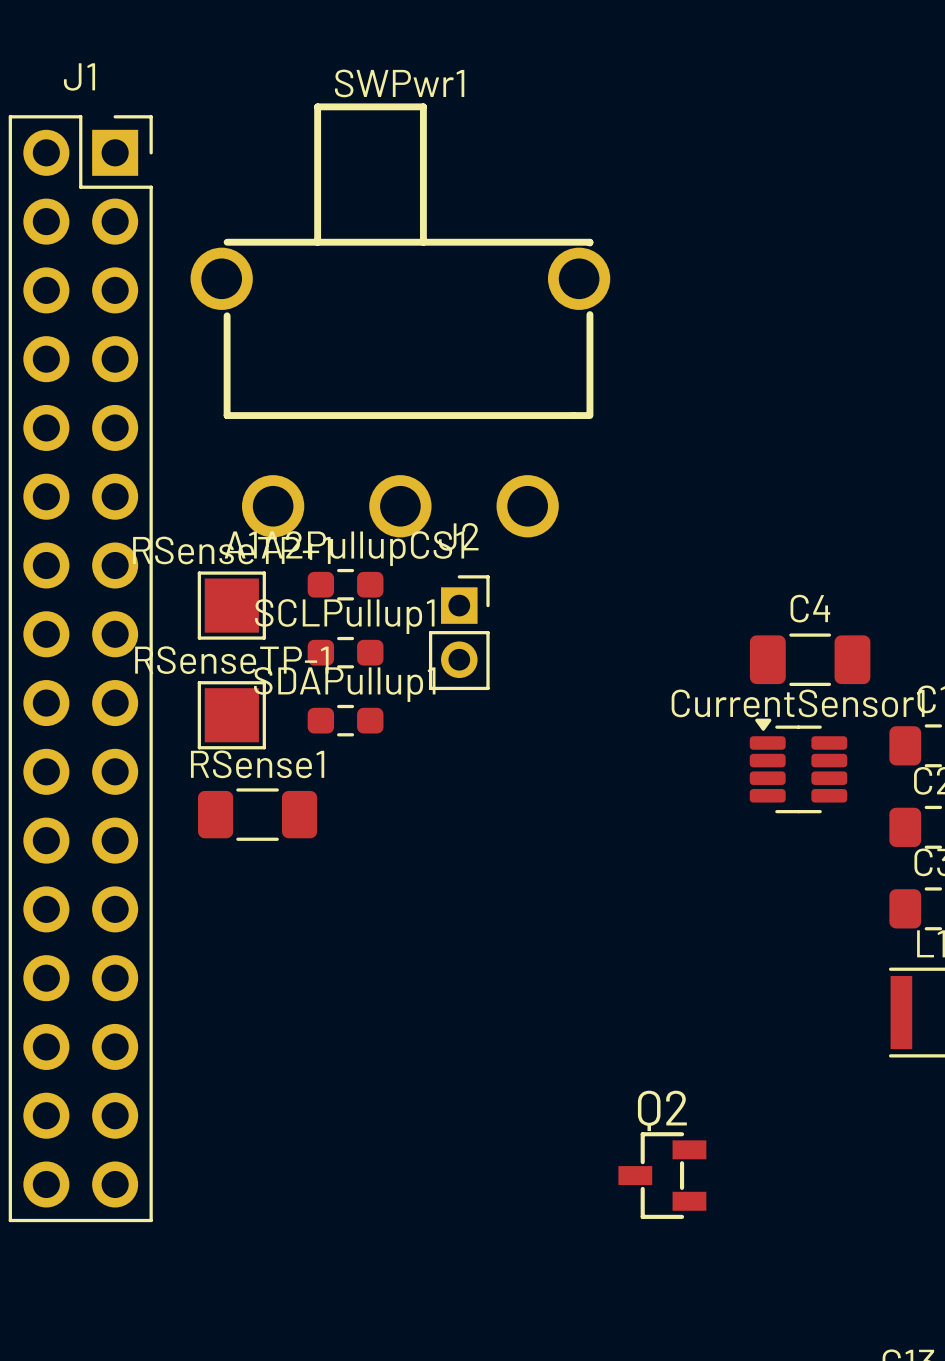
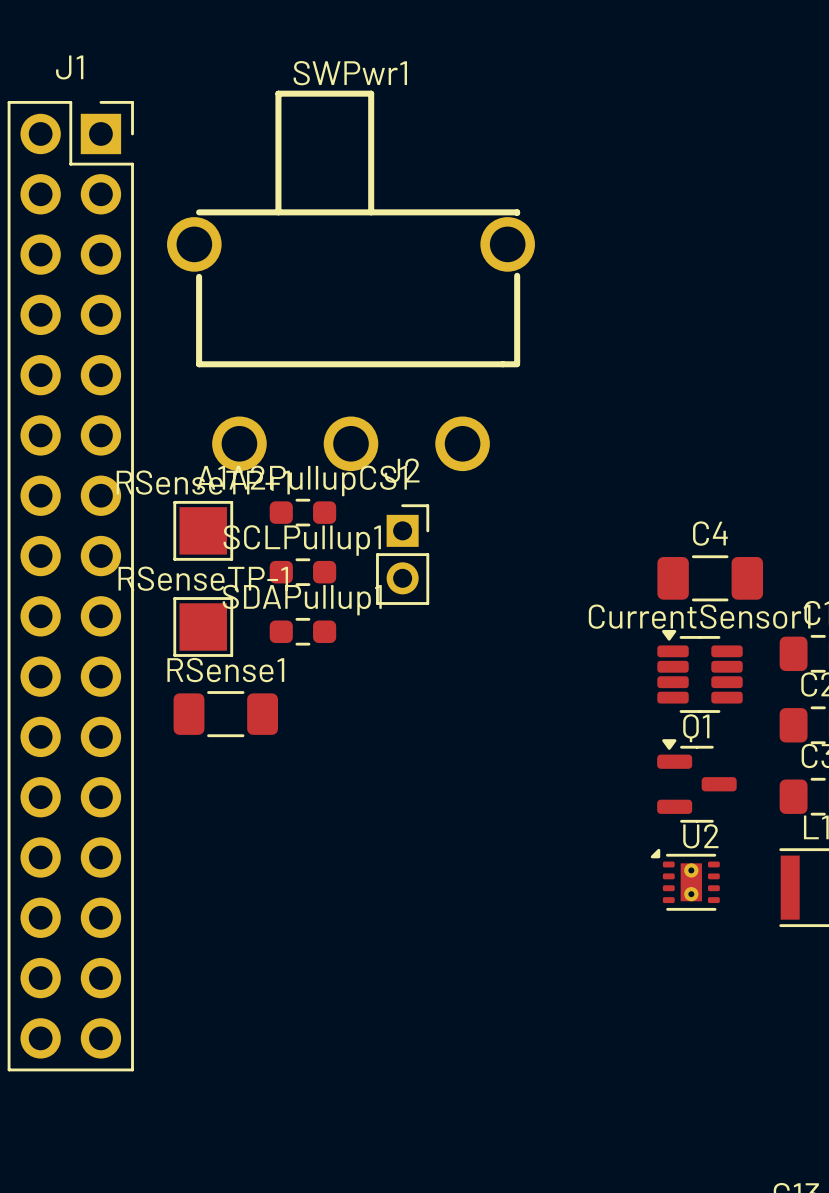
Q1: none -> (696, 780)
U2: none -> (685, 879)
Q2: (662, 1175) -> none

